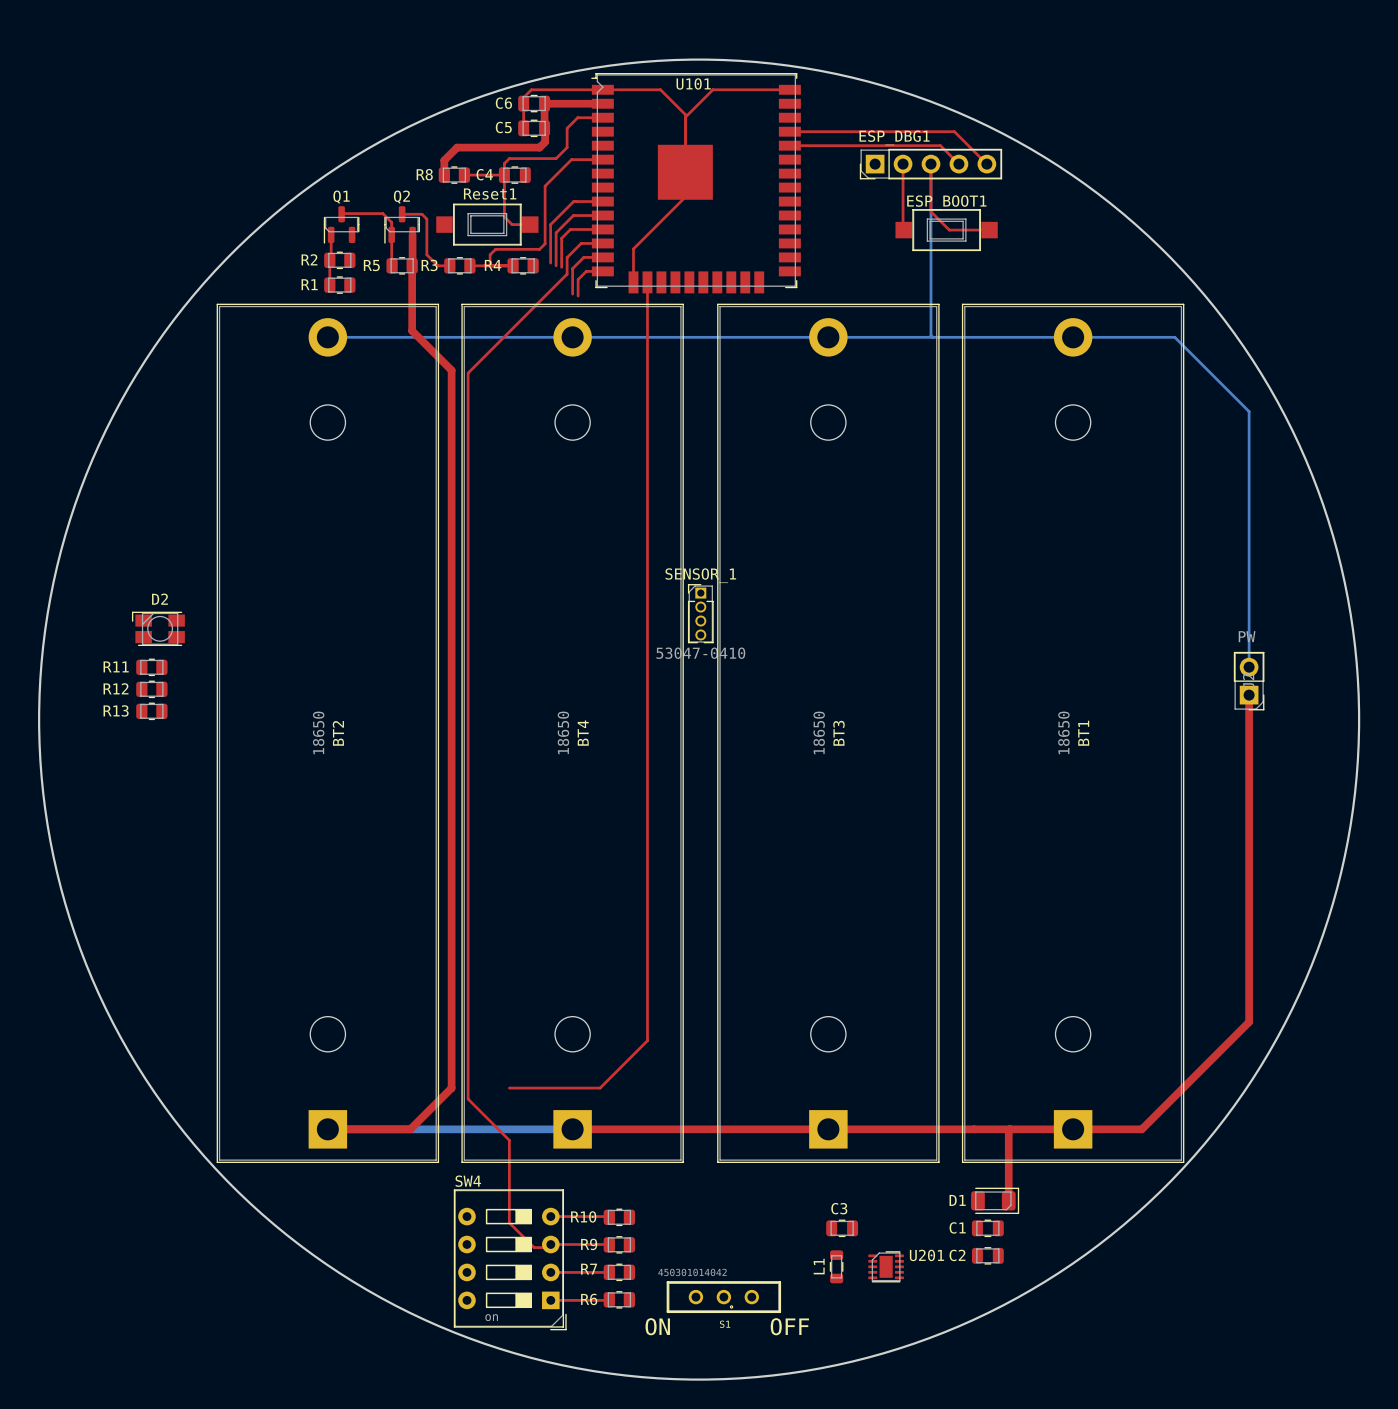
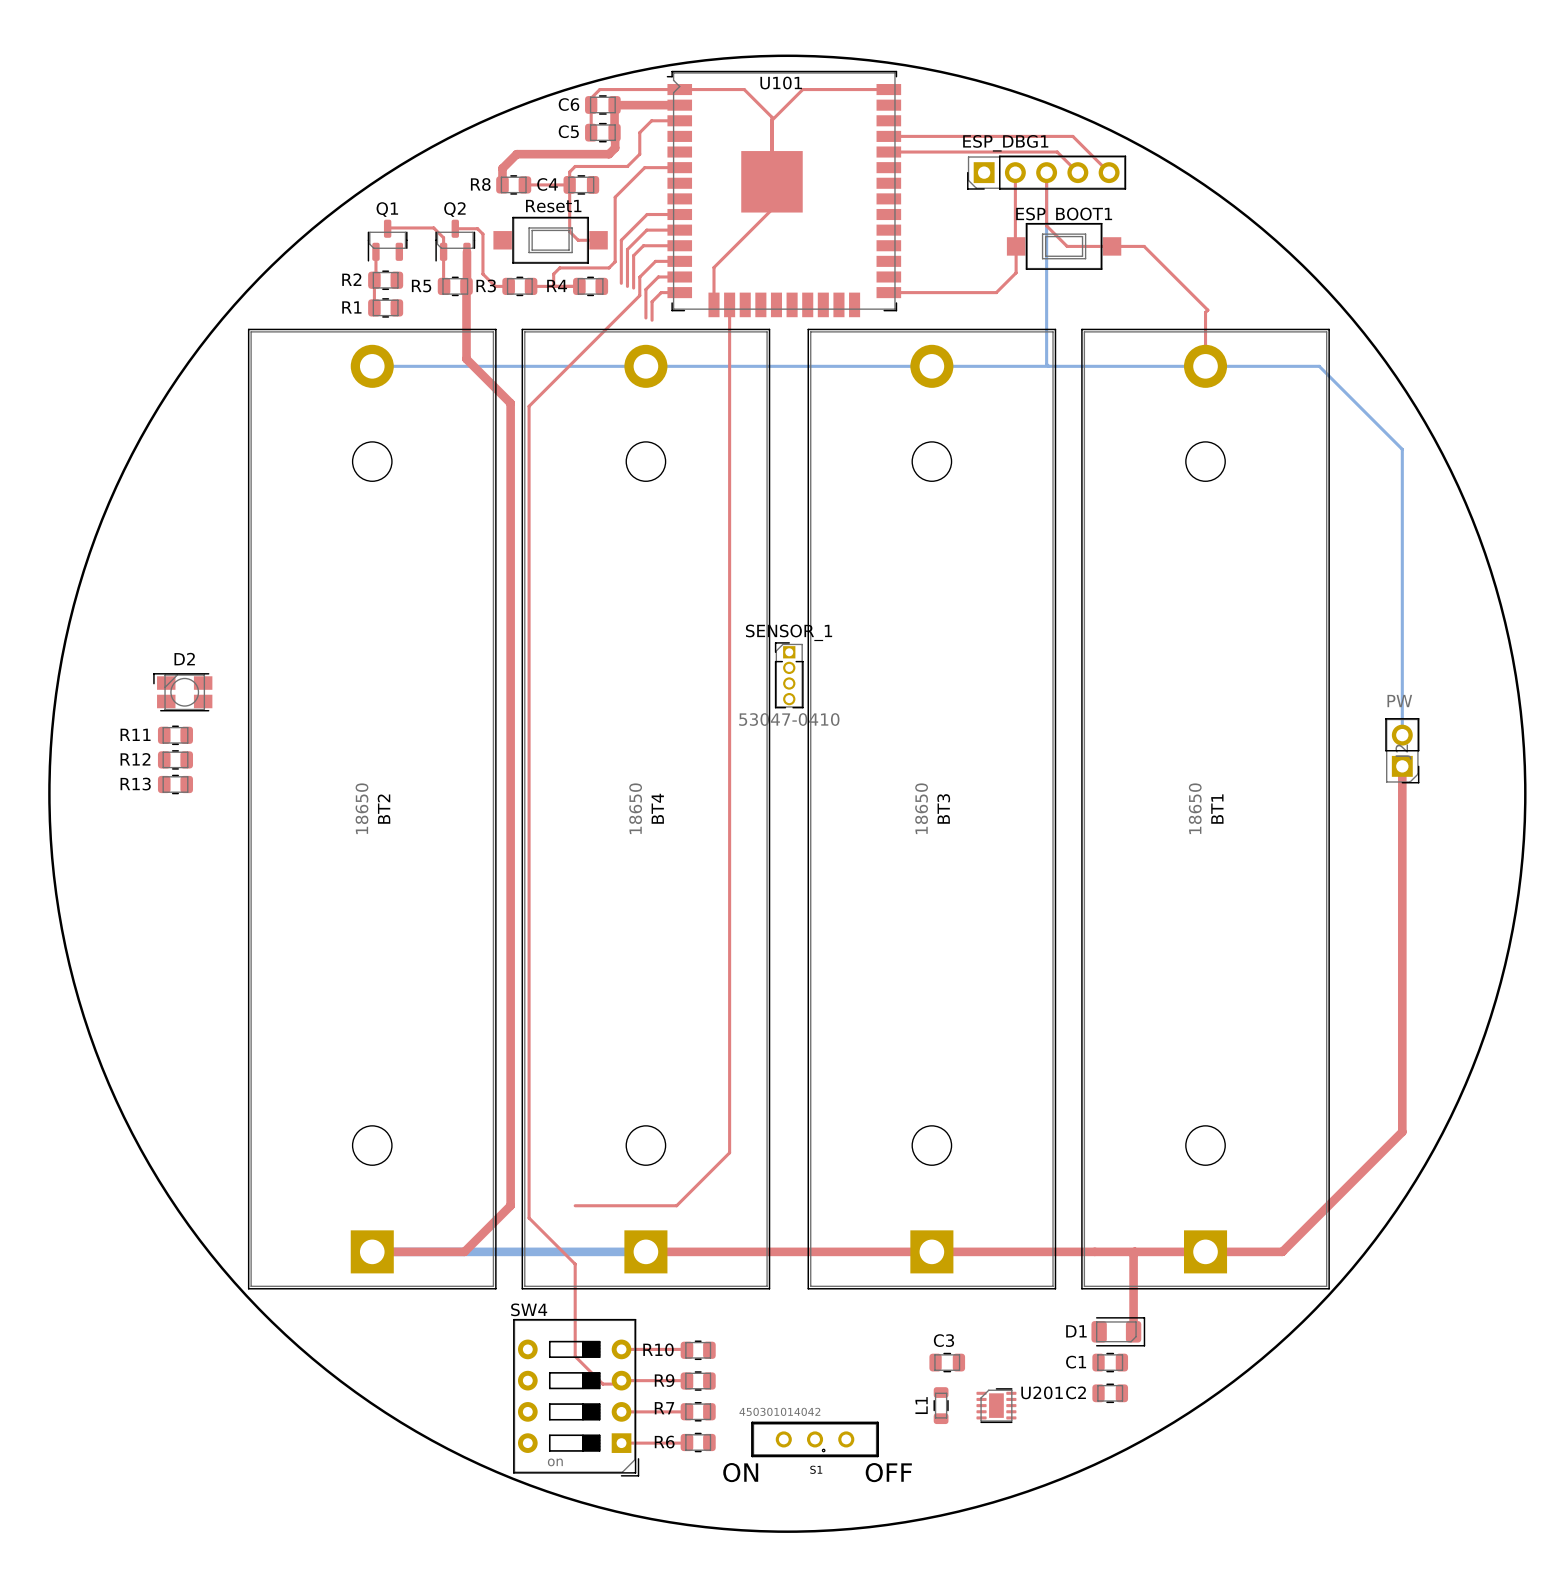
top track: none -> (1016, 246) (1016, 272) (996, 292) (888, 292)
top track: none -> (1112, 246) (1144, 246) (1207, 310) (1205, 312) (1205, 366)

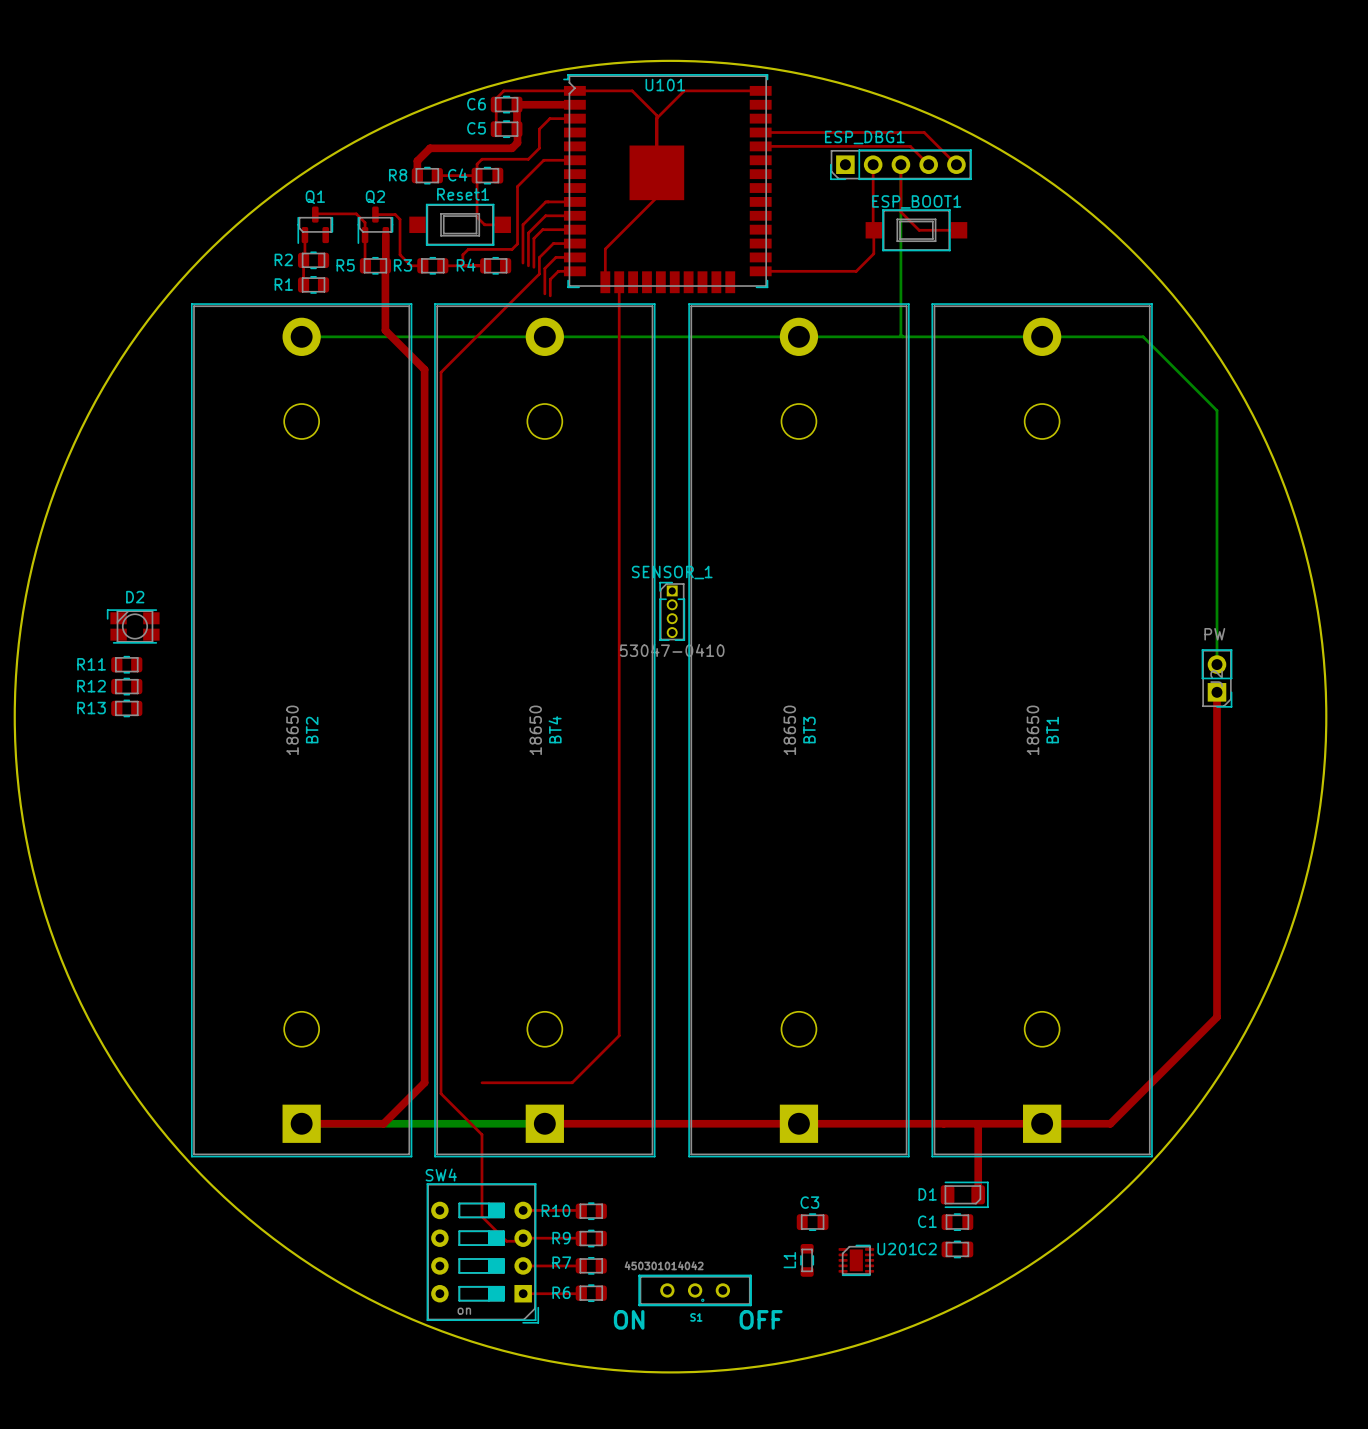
top track: (1112, 246) (1144, 246) (1207, 310) (1205, 312) (1205, 366) -> none

